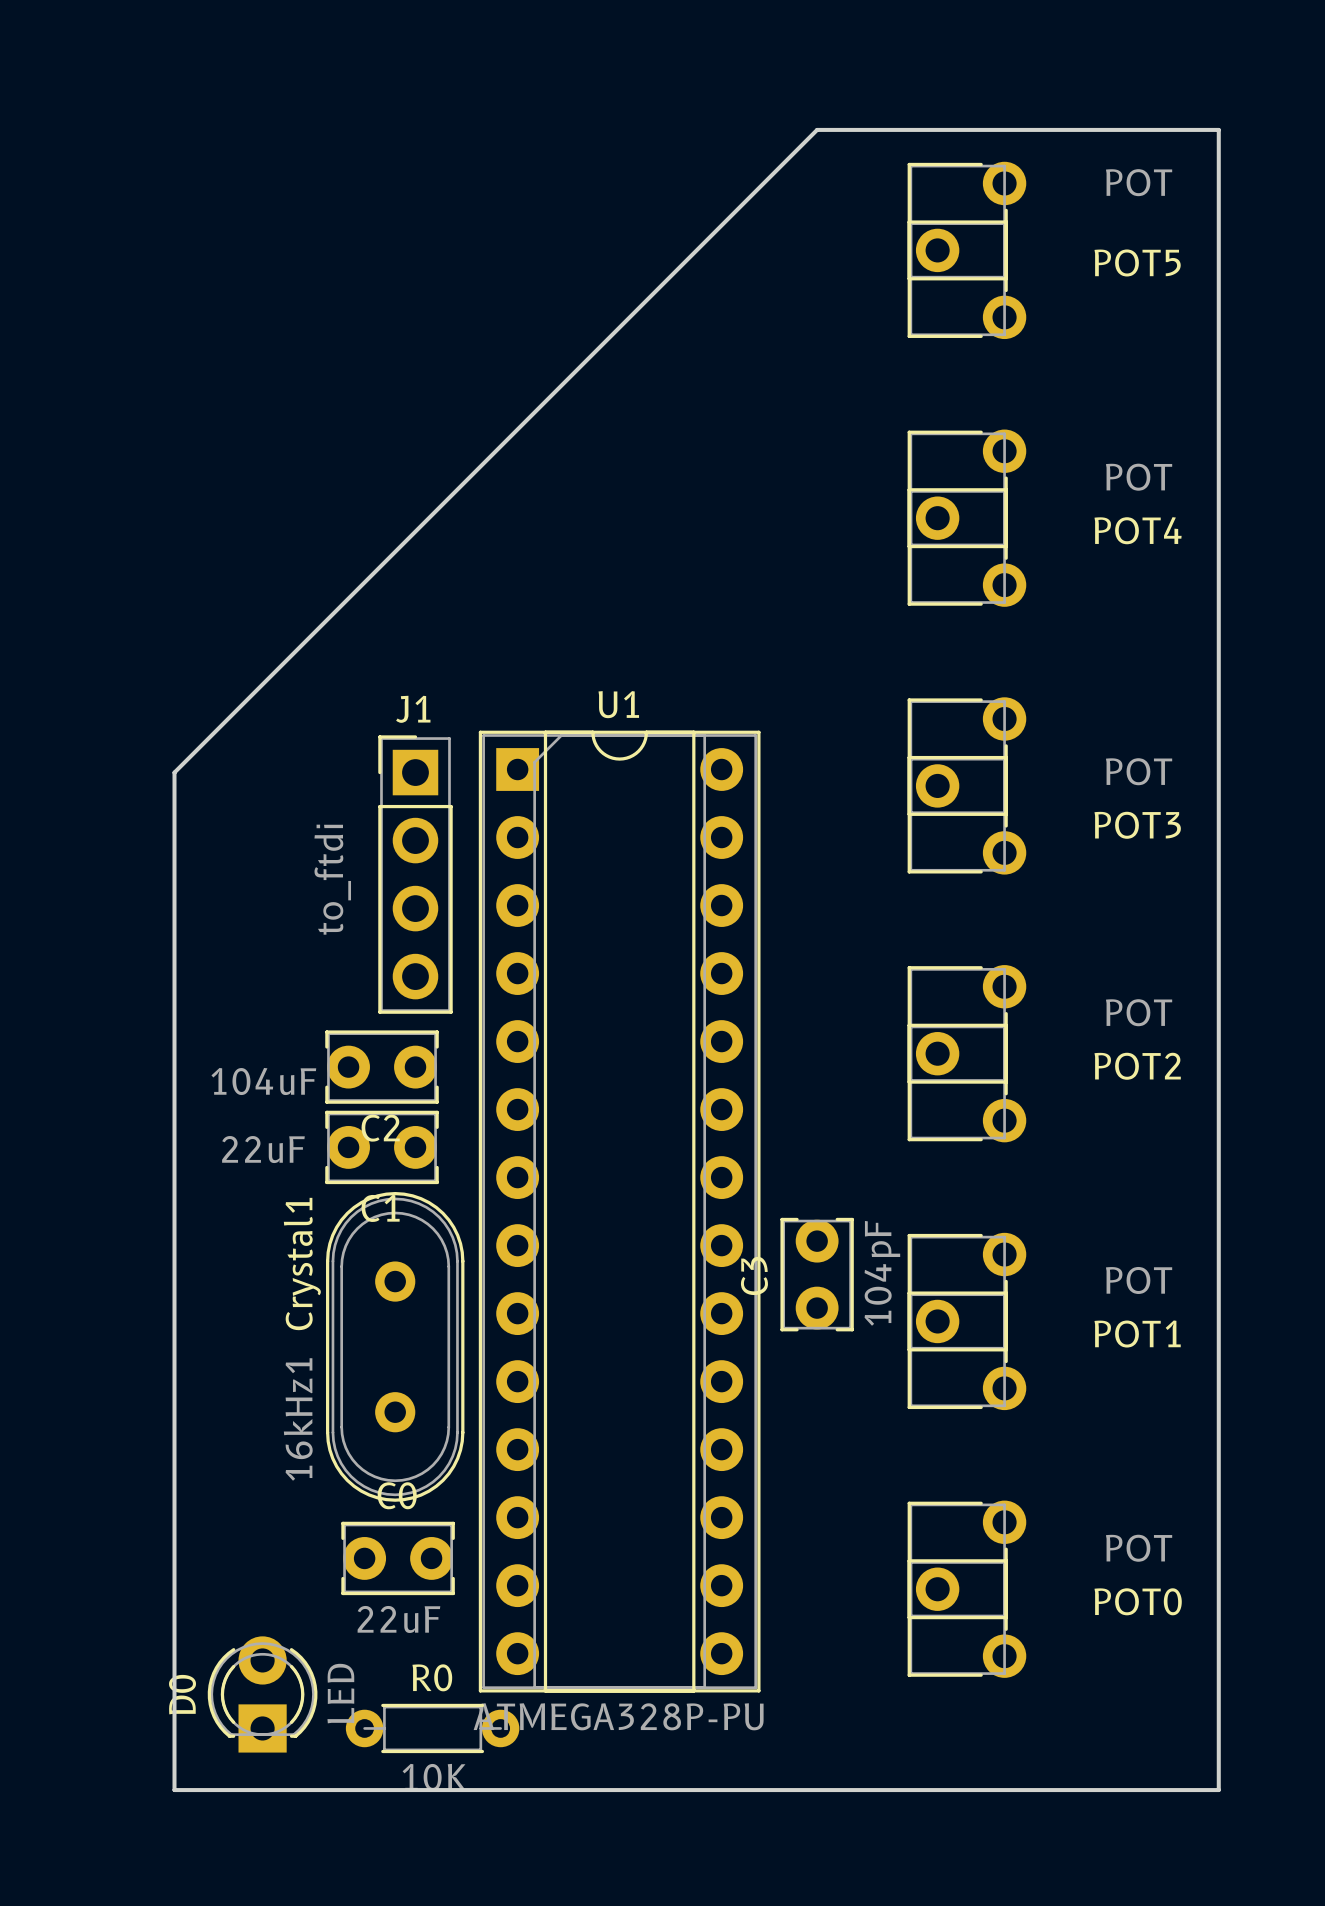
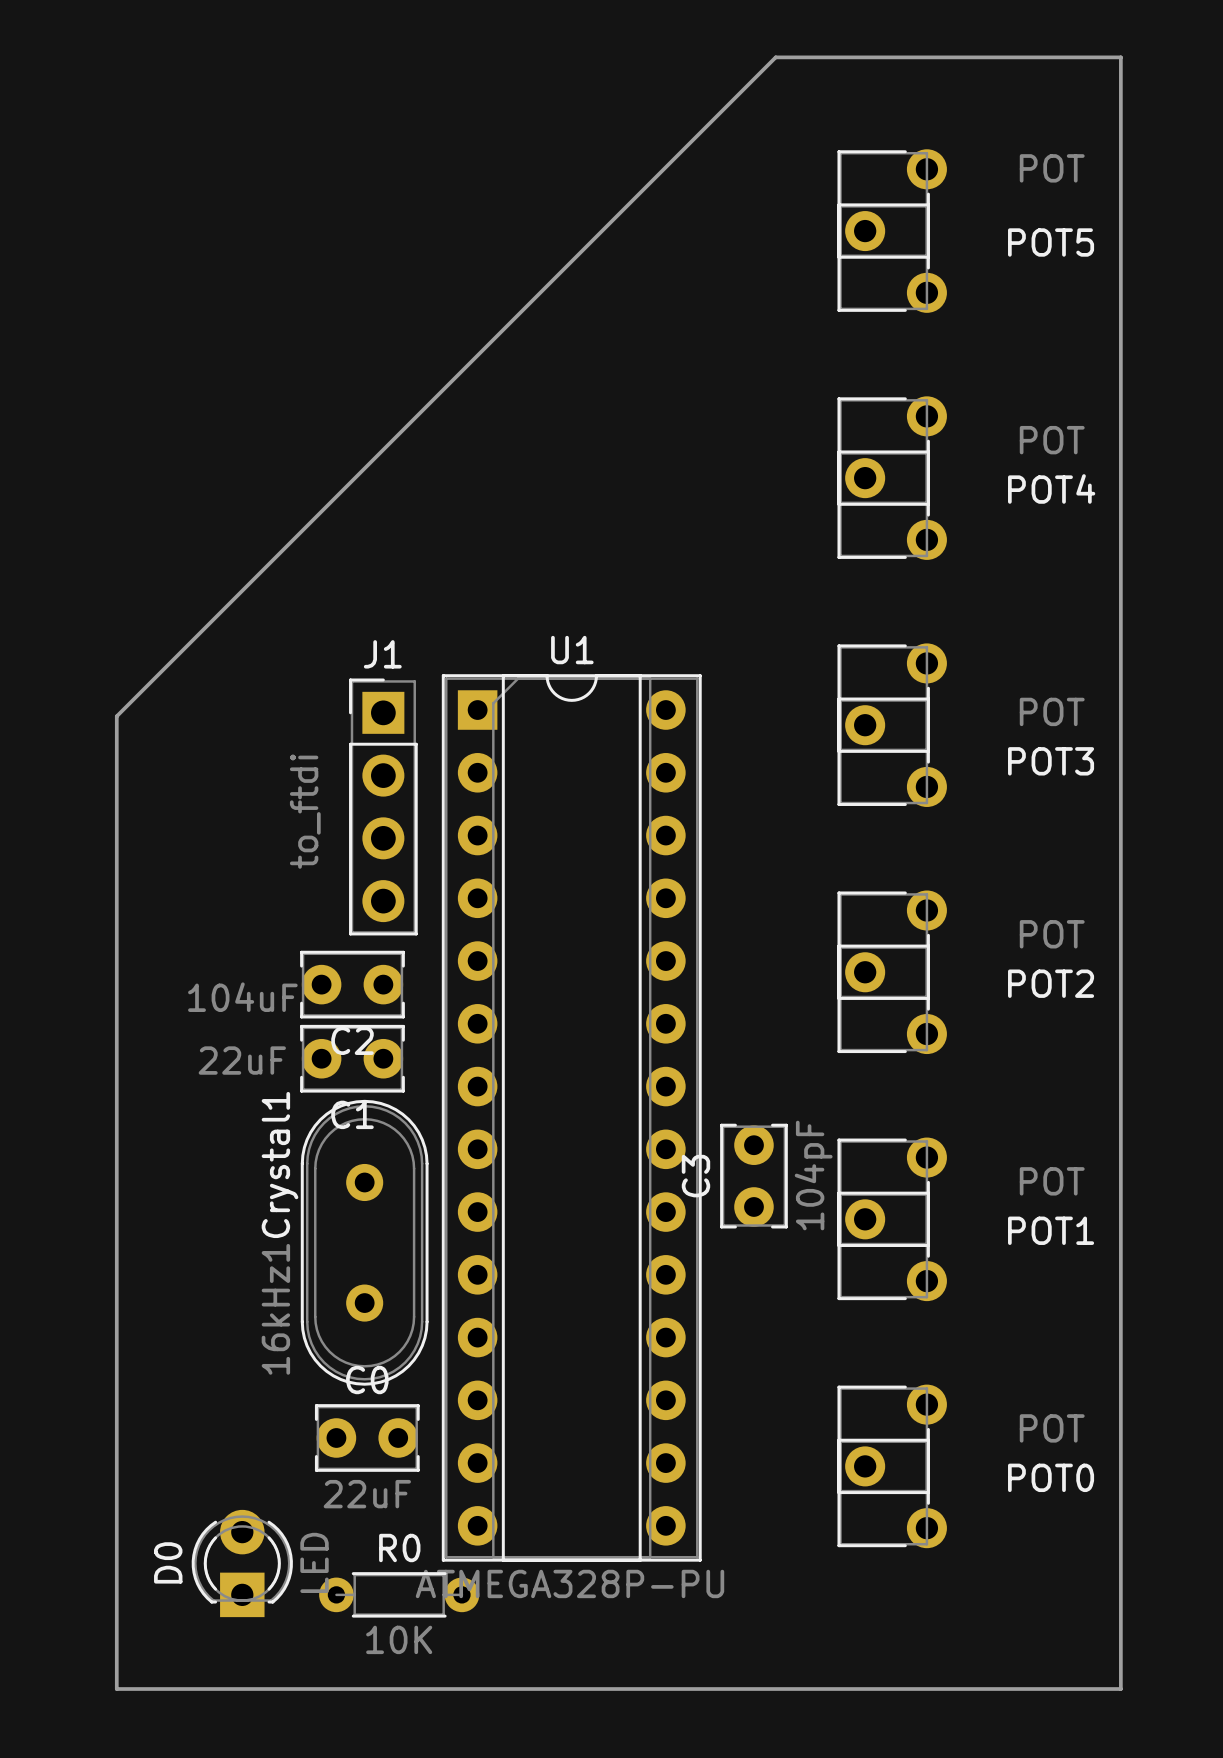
board edge: (817, 129) (174, 772) (174, 1790) (1218, 1790) (1218, 129) (817, 129) -> (775, 57) (116, 716) (116, 1689) (1120, 1689) (1120, 57) (775, 57)

